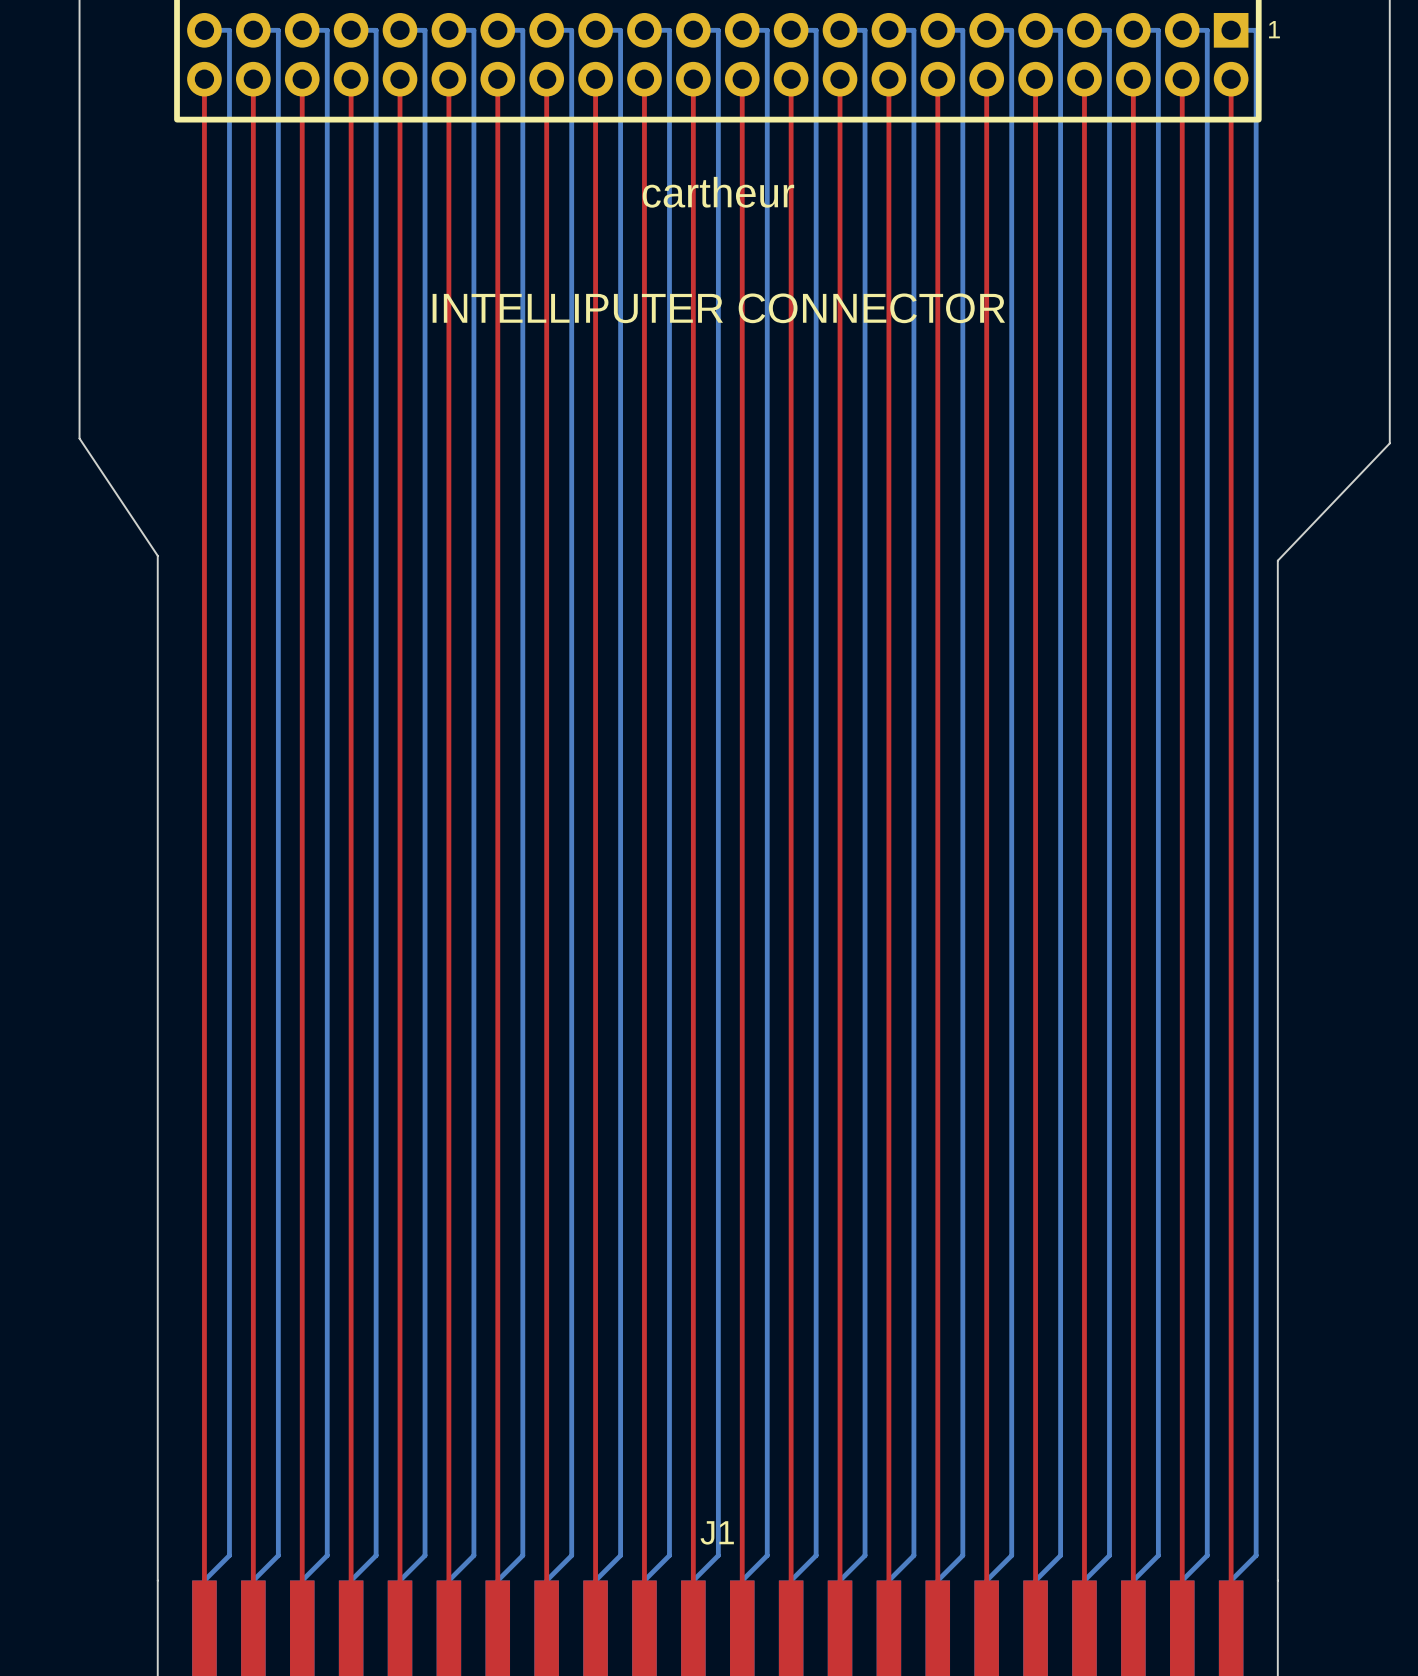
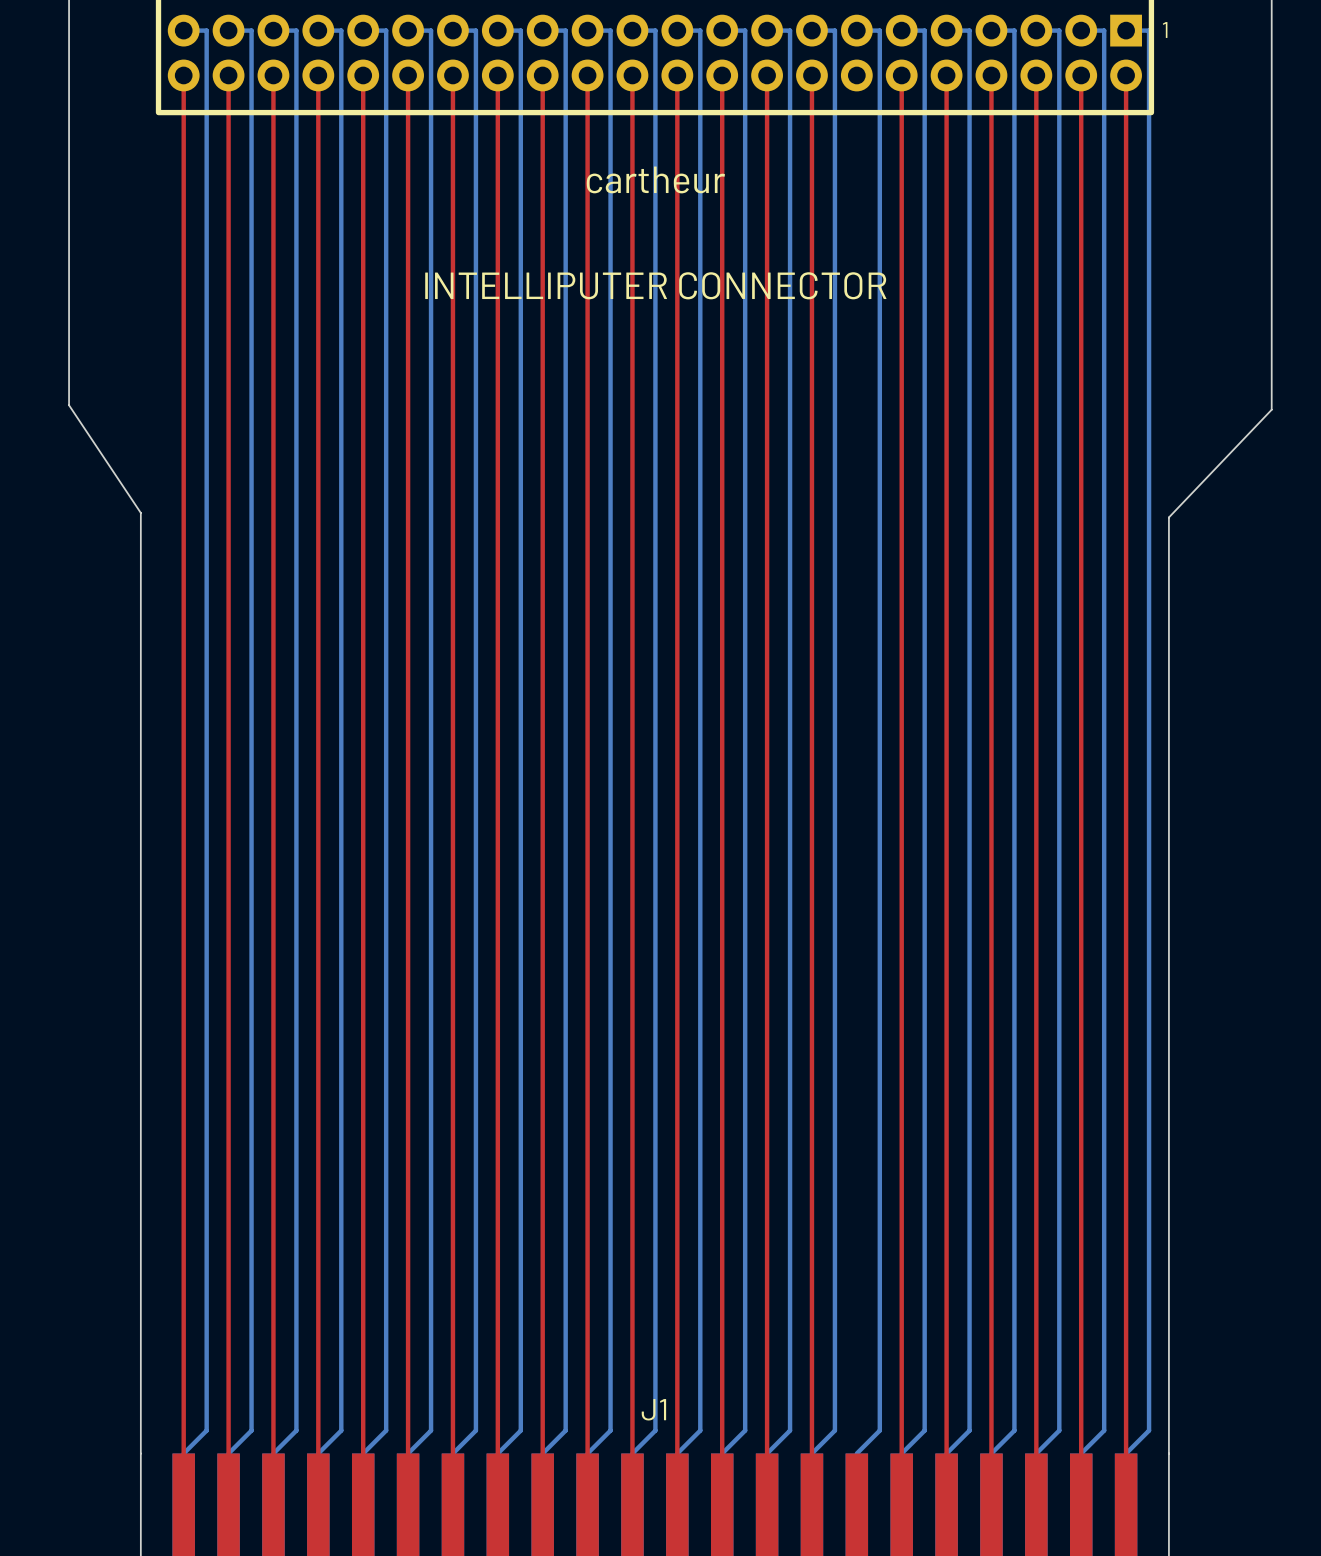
top track: (937, 79) (937, 1580) -> none

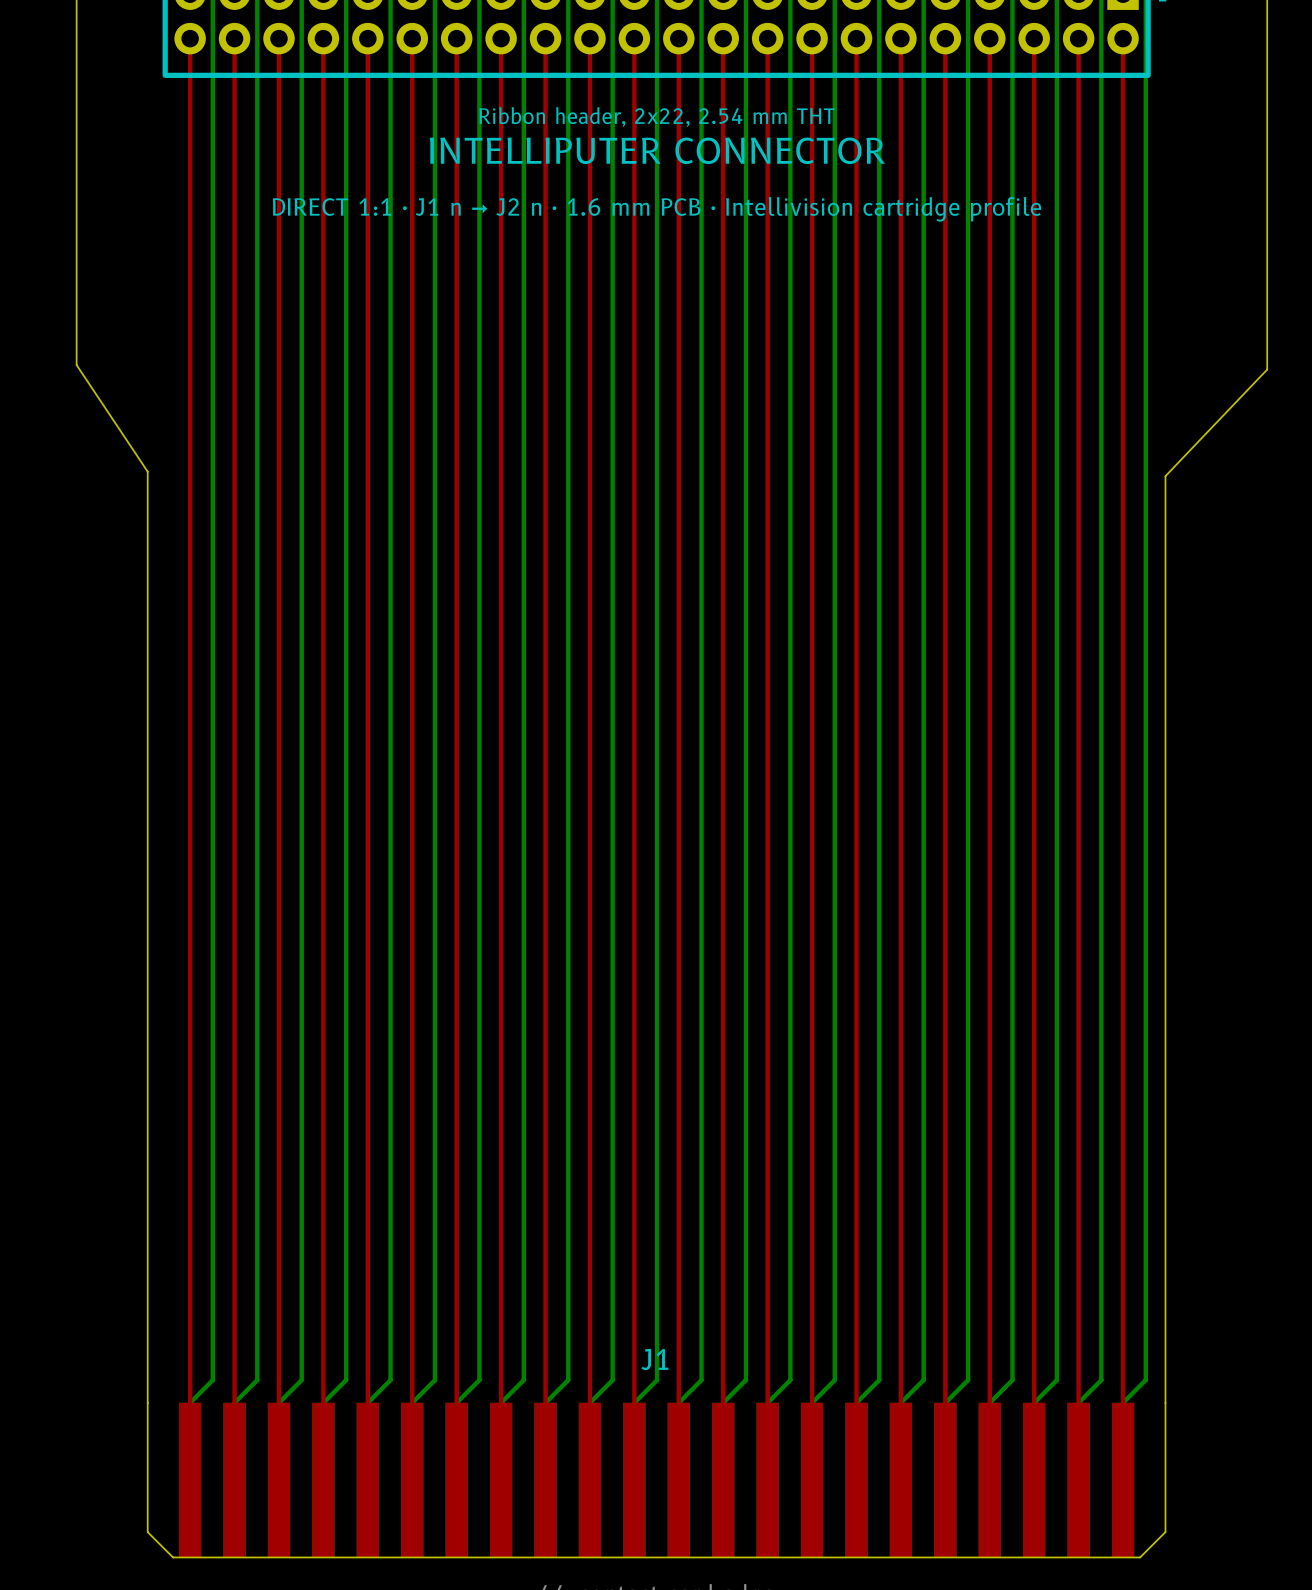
top track: none -> (856, 38) (856, 1402)
part value: none -> Ribbon header, 2x22, 2.54 mm THT (656, 117)
text: cartheur (655, 179) -> none
text: none -> DIRECT 1:1 · J1 n → J2 n · 1.6 mm PCB · Intellivision cartridge profile (656, 209)
text position: INTELLIPUTER CONNECTOR (655, 285) -> INTELLIPUTER CONNECTOR (657, 150)

